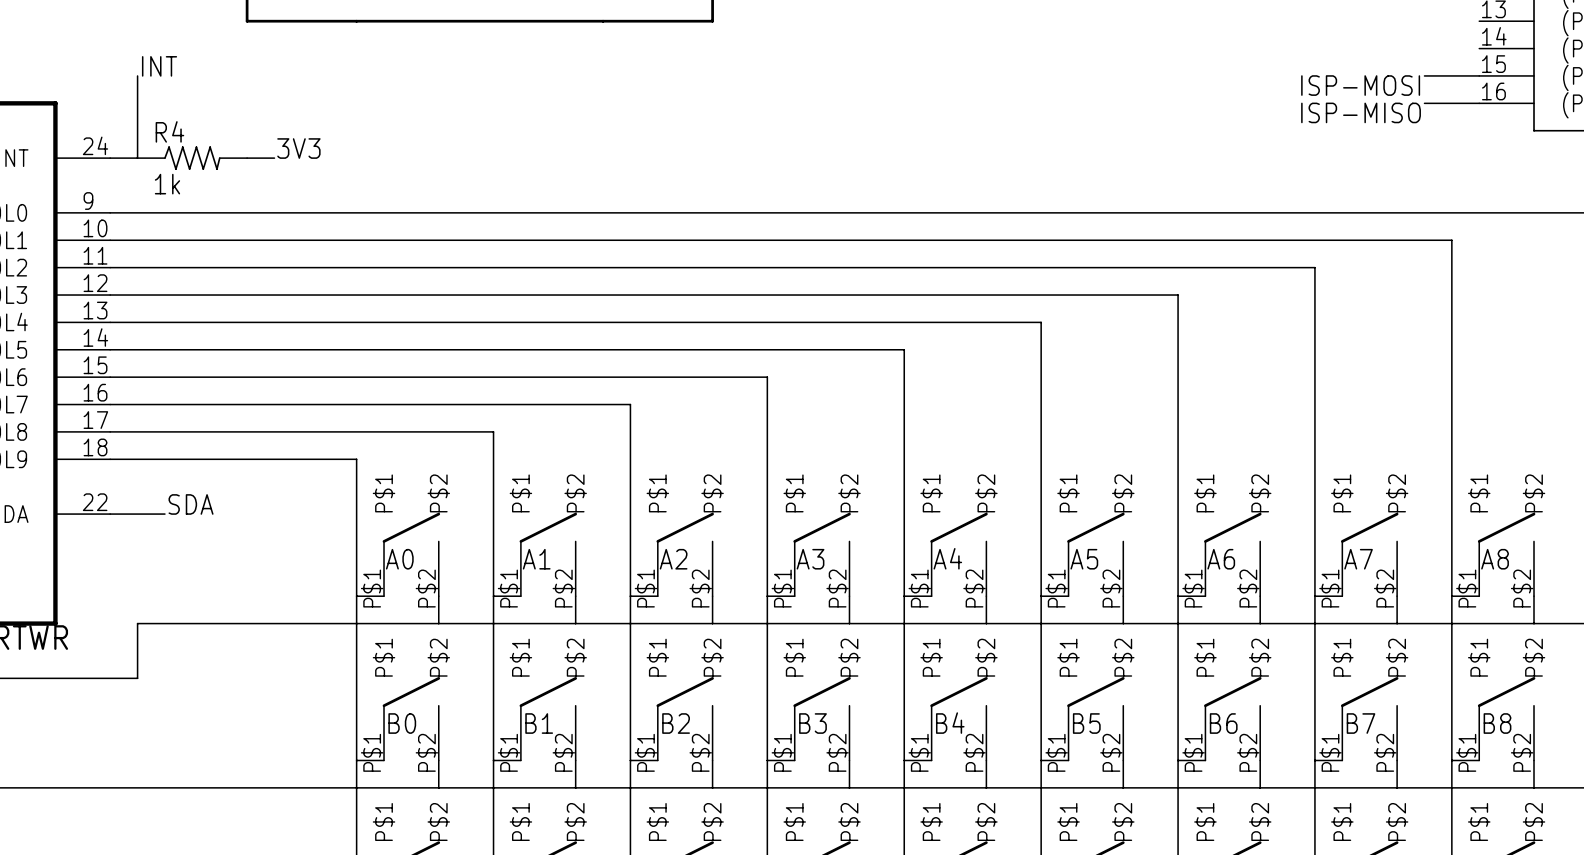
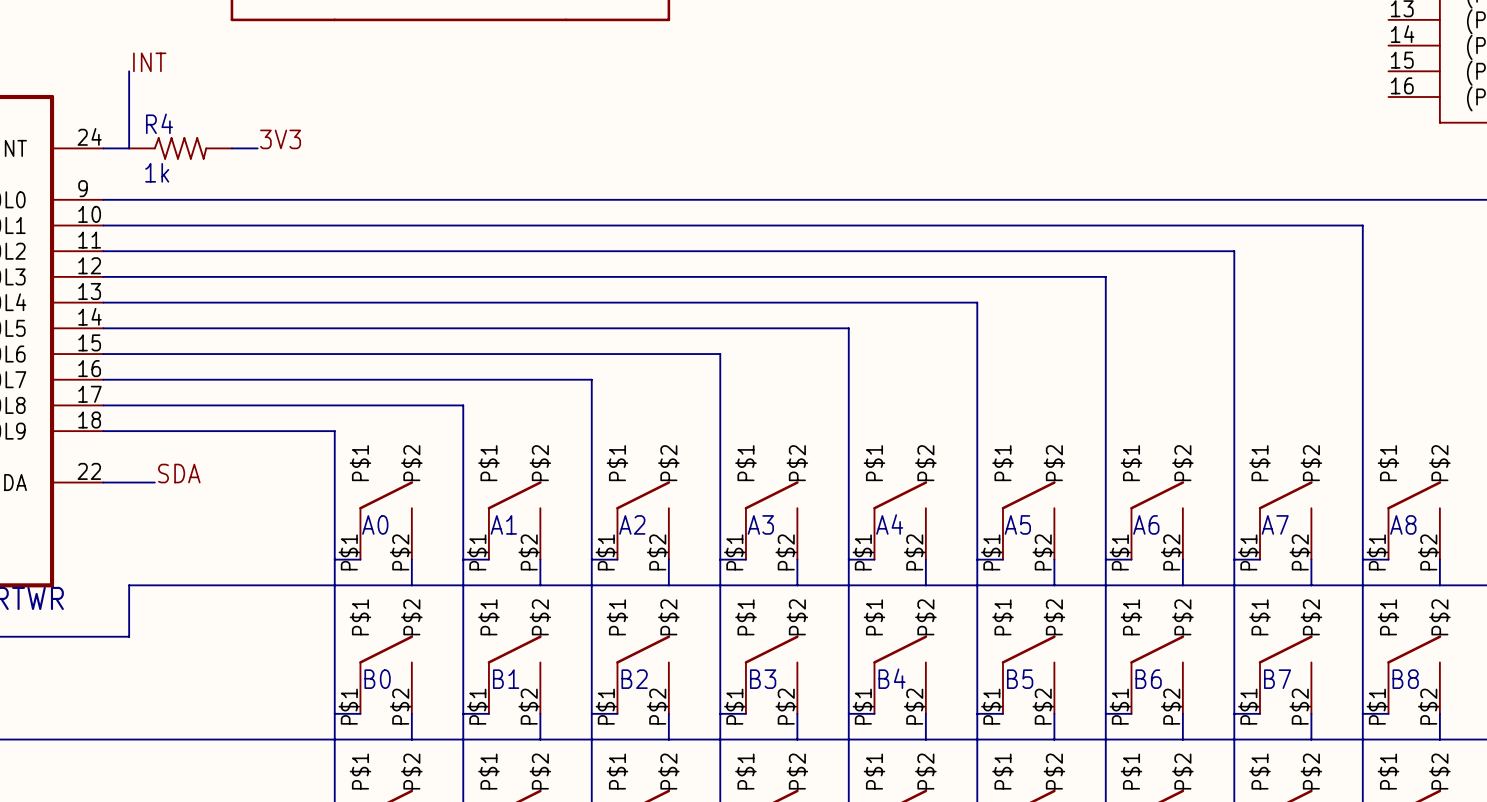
wire: (1424, 75) (1479, 75) -> none
label: ISP-MOSI (1360, 85) -> none
wire: (1424, 103) (1479, 103) -> none
label: ISP-MISO (1361, 112) -> none

